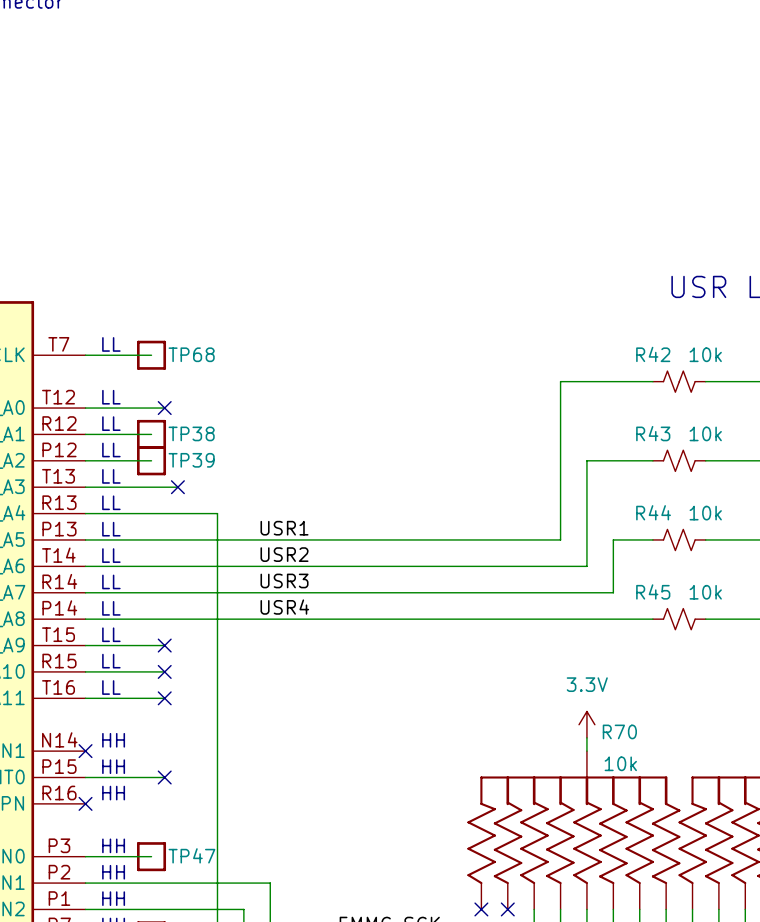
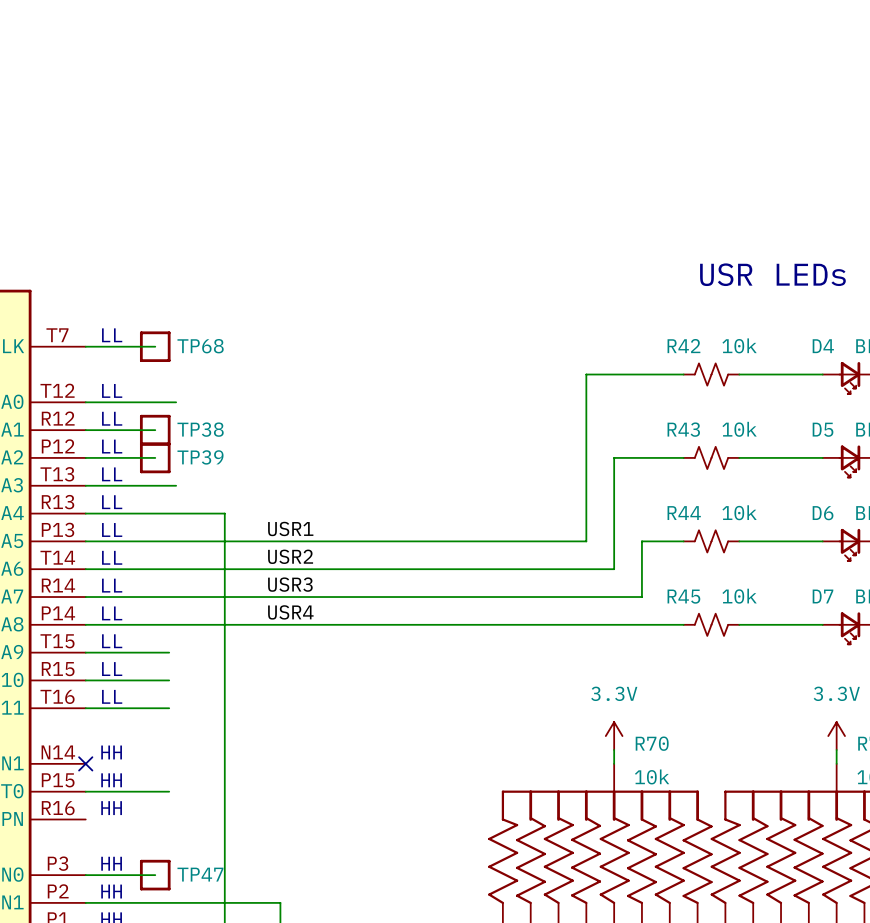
no-connect mark: (164, 408) -> none
wire: (171, 487) (177, 487) -> (169, 402) (176, 402)
no-connect mark: (177, 487) -> none
no-connect mark: (164, 645) -> none
no-connect mark: (164, 671) -> none
no-connect mark: (164, 698) -> none
no-connect mark: (164, 777) -> none
no-connect mark: (85, 803) -> none

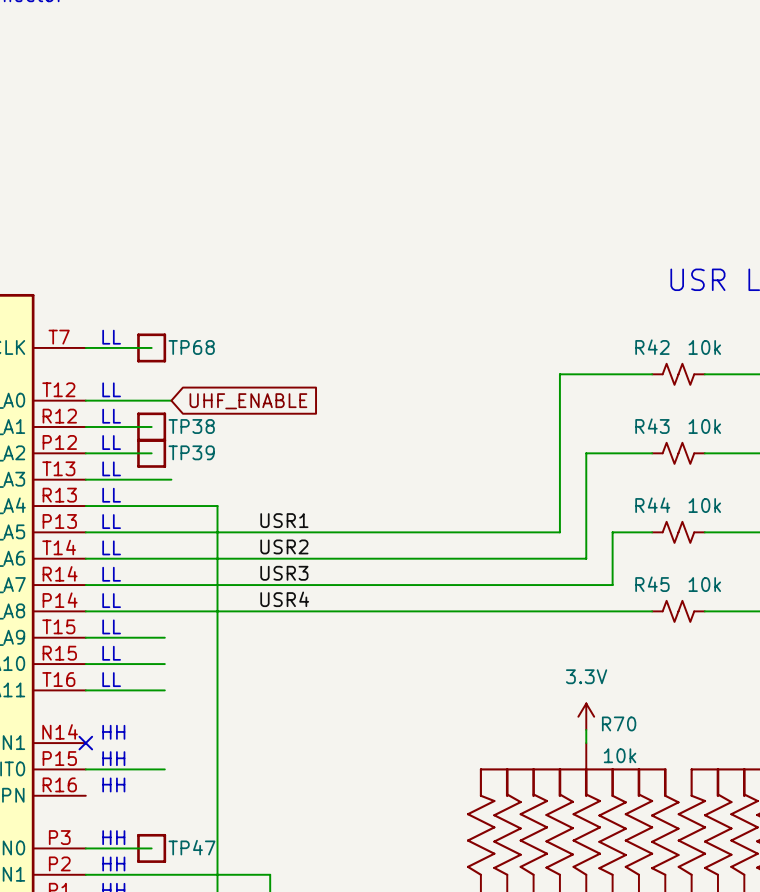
global label: none -> UHF_ENABLE (248, 401)

